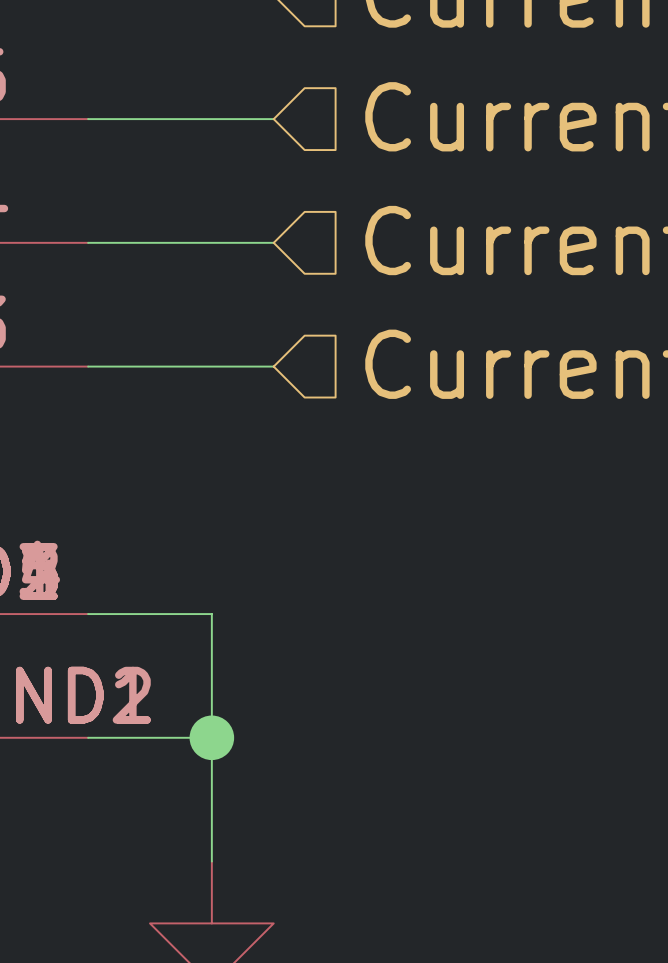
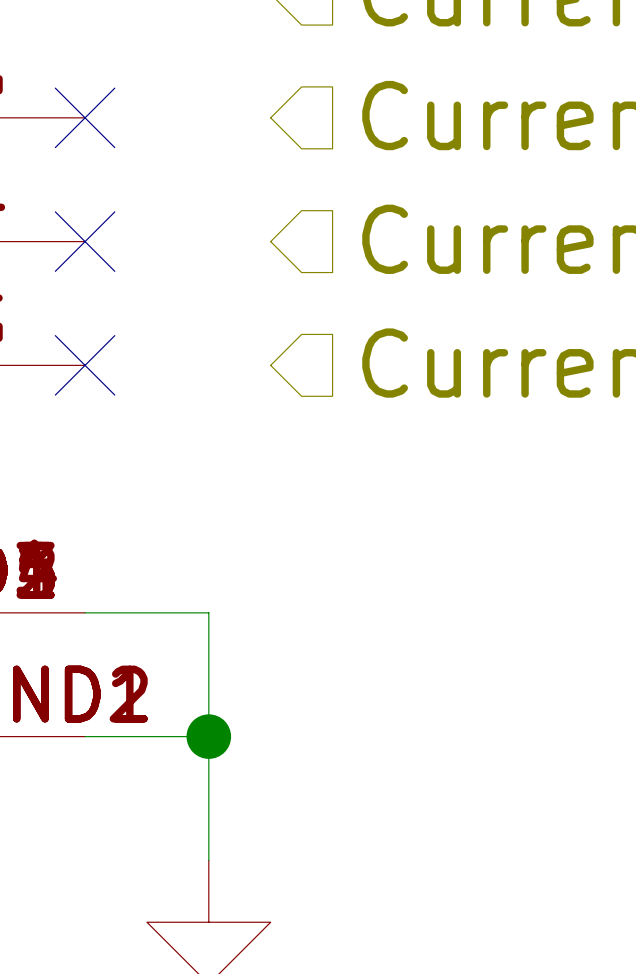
wire: (88, 119) (273, 119) -> none
no-connect mark: none -> (85, 117)
wire: (88, 242) (273, 242) -> none
no-connect mark: none -> (85, 241)
wire: (88, 366) (273, 366) -> none
no-connect mark: none -> (85, 365)

